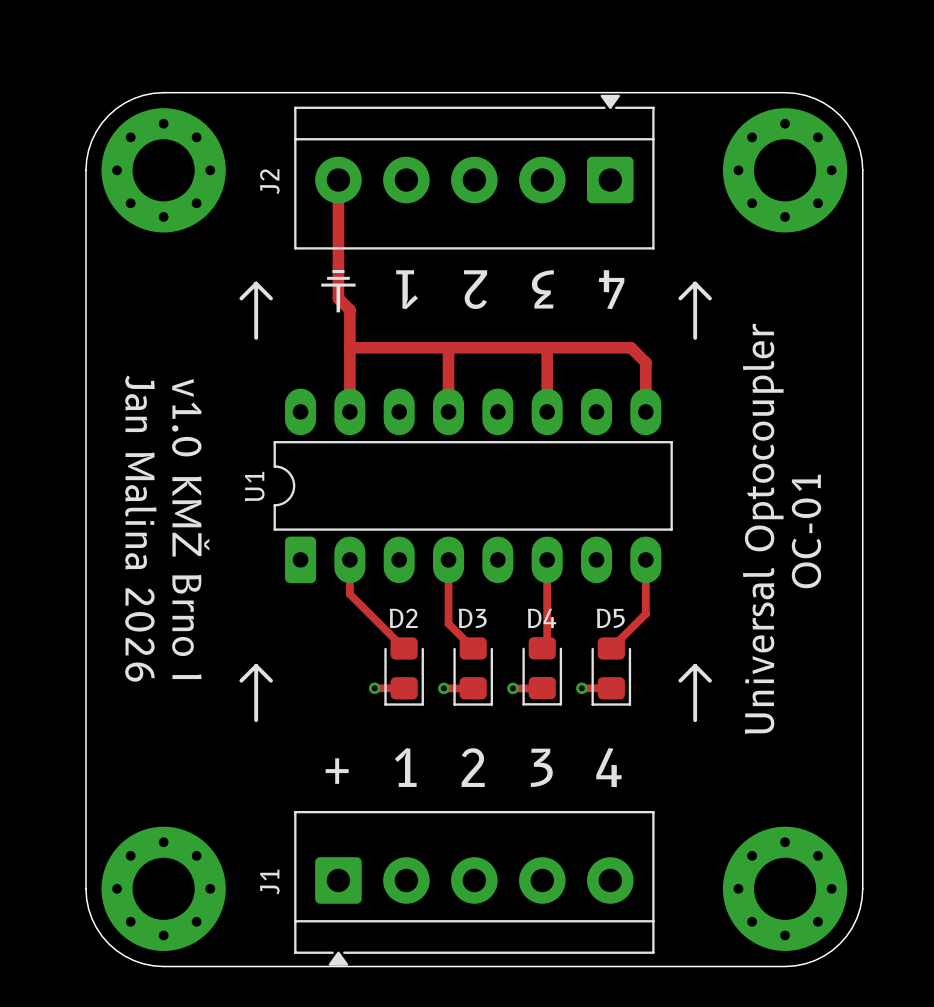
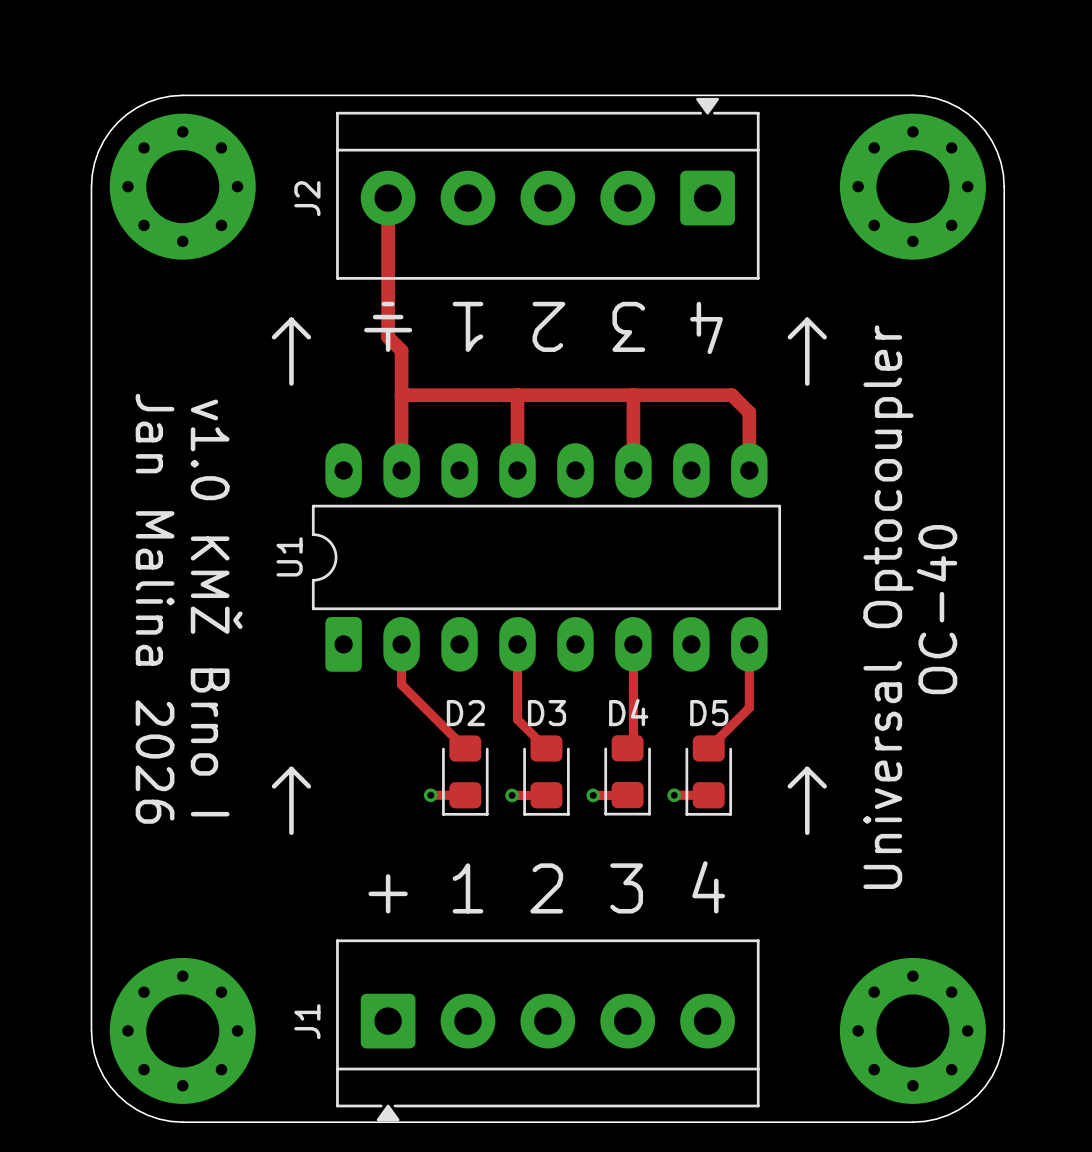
text: OC-01 (806, 531) -> OC-40 (937, 609)

